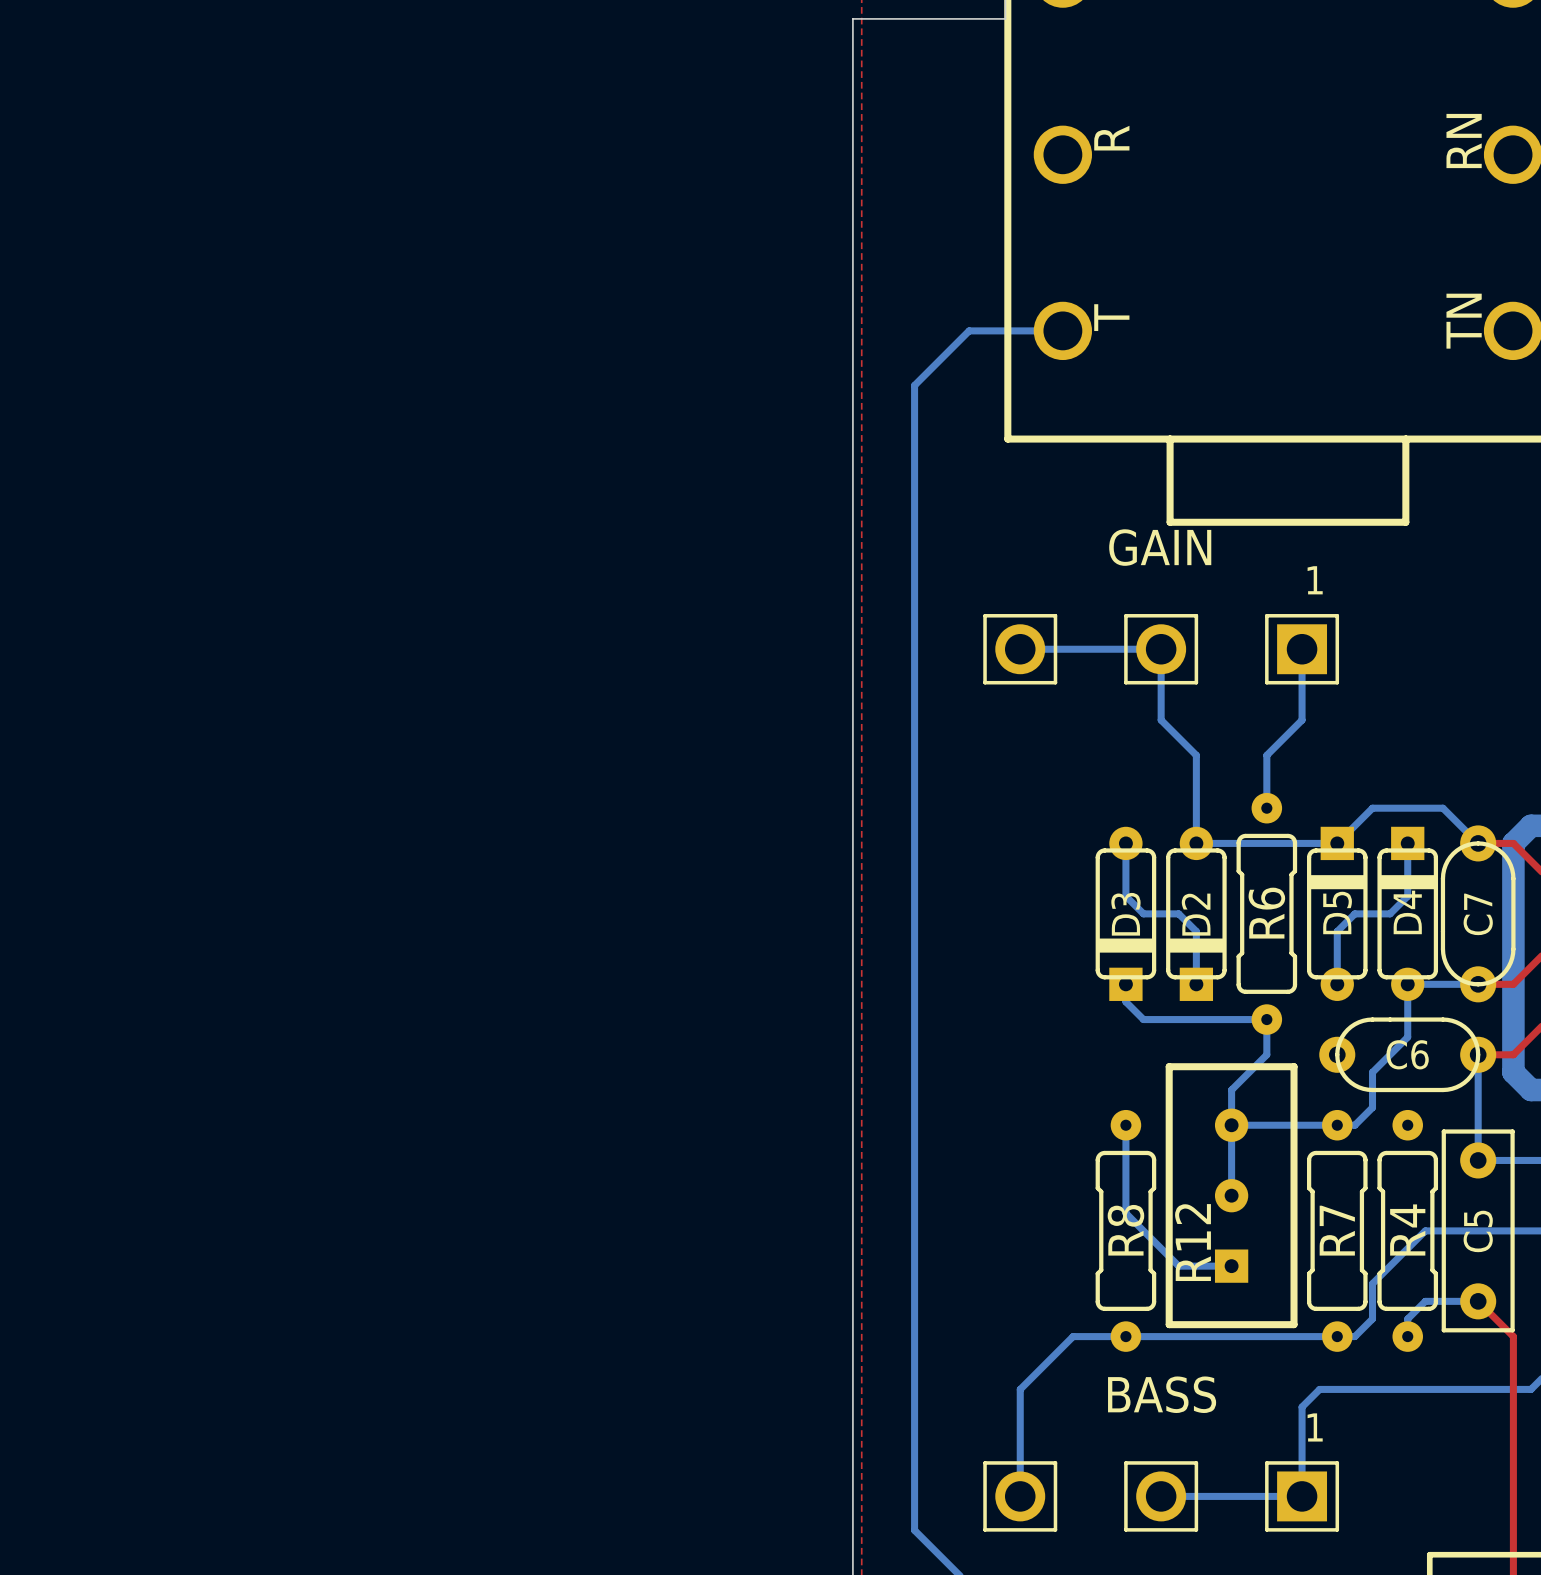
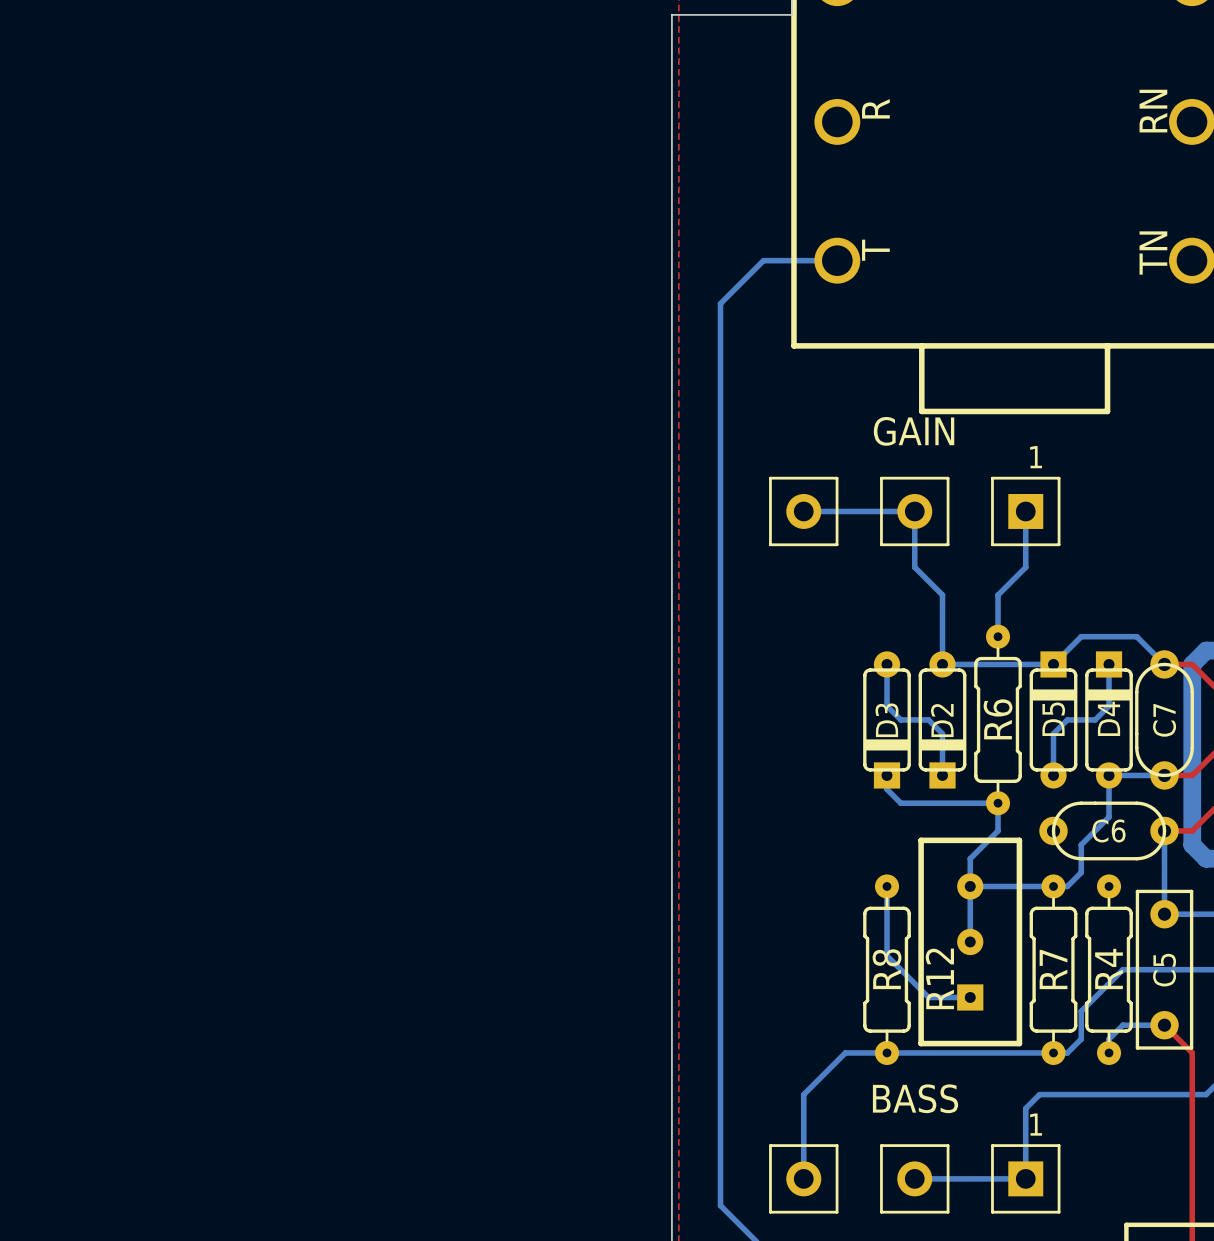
GAIN footprint: [983, 614, 1340, 685] -> [769, 476, 1061, 547]
R6 footprint: [1236, 792, 1298, 1035] -> [974, 624, 1022, 816]
R8 footprint: [1095, 1109, 1157, 1352] -> [863, 874, 911, 1065]
R7 footprint: [1306, 1109, 1368, 1352] -> [1029, 874, 1078, 1065]
R4 footprint: [1377, 1109, 1439, 1352] -> [1085, 874, 1133, 1065]
BASS footprint: [983, 1461, 1340, 1532] -> [769, 1144, 1061, 1214]

